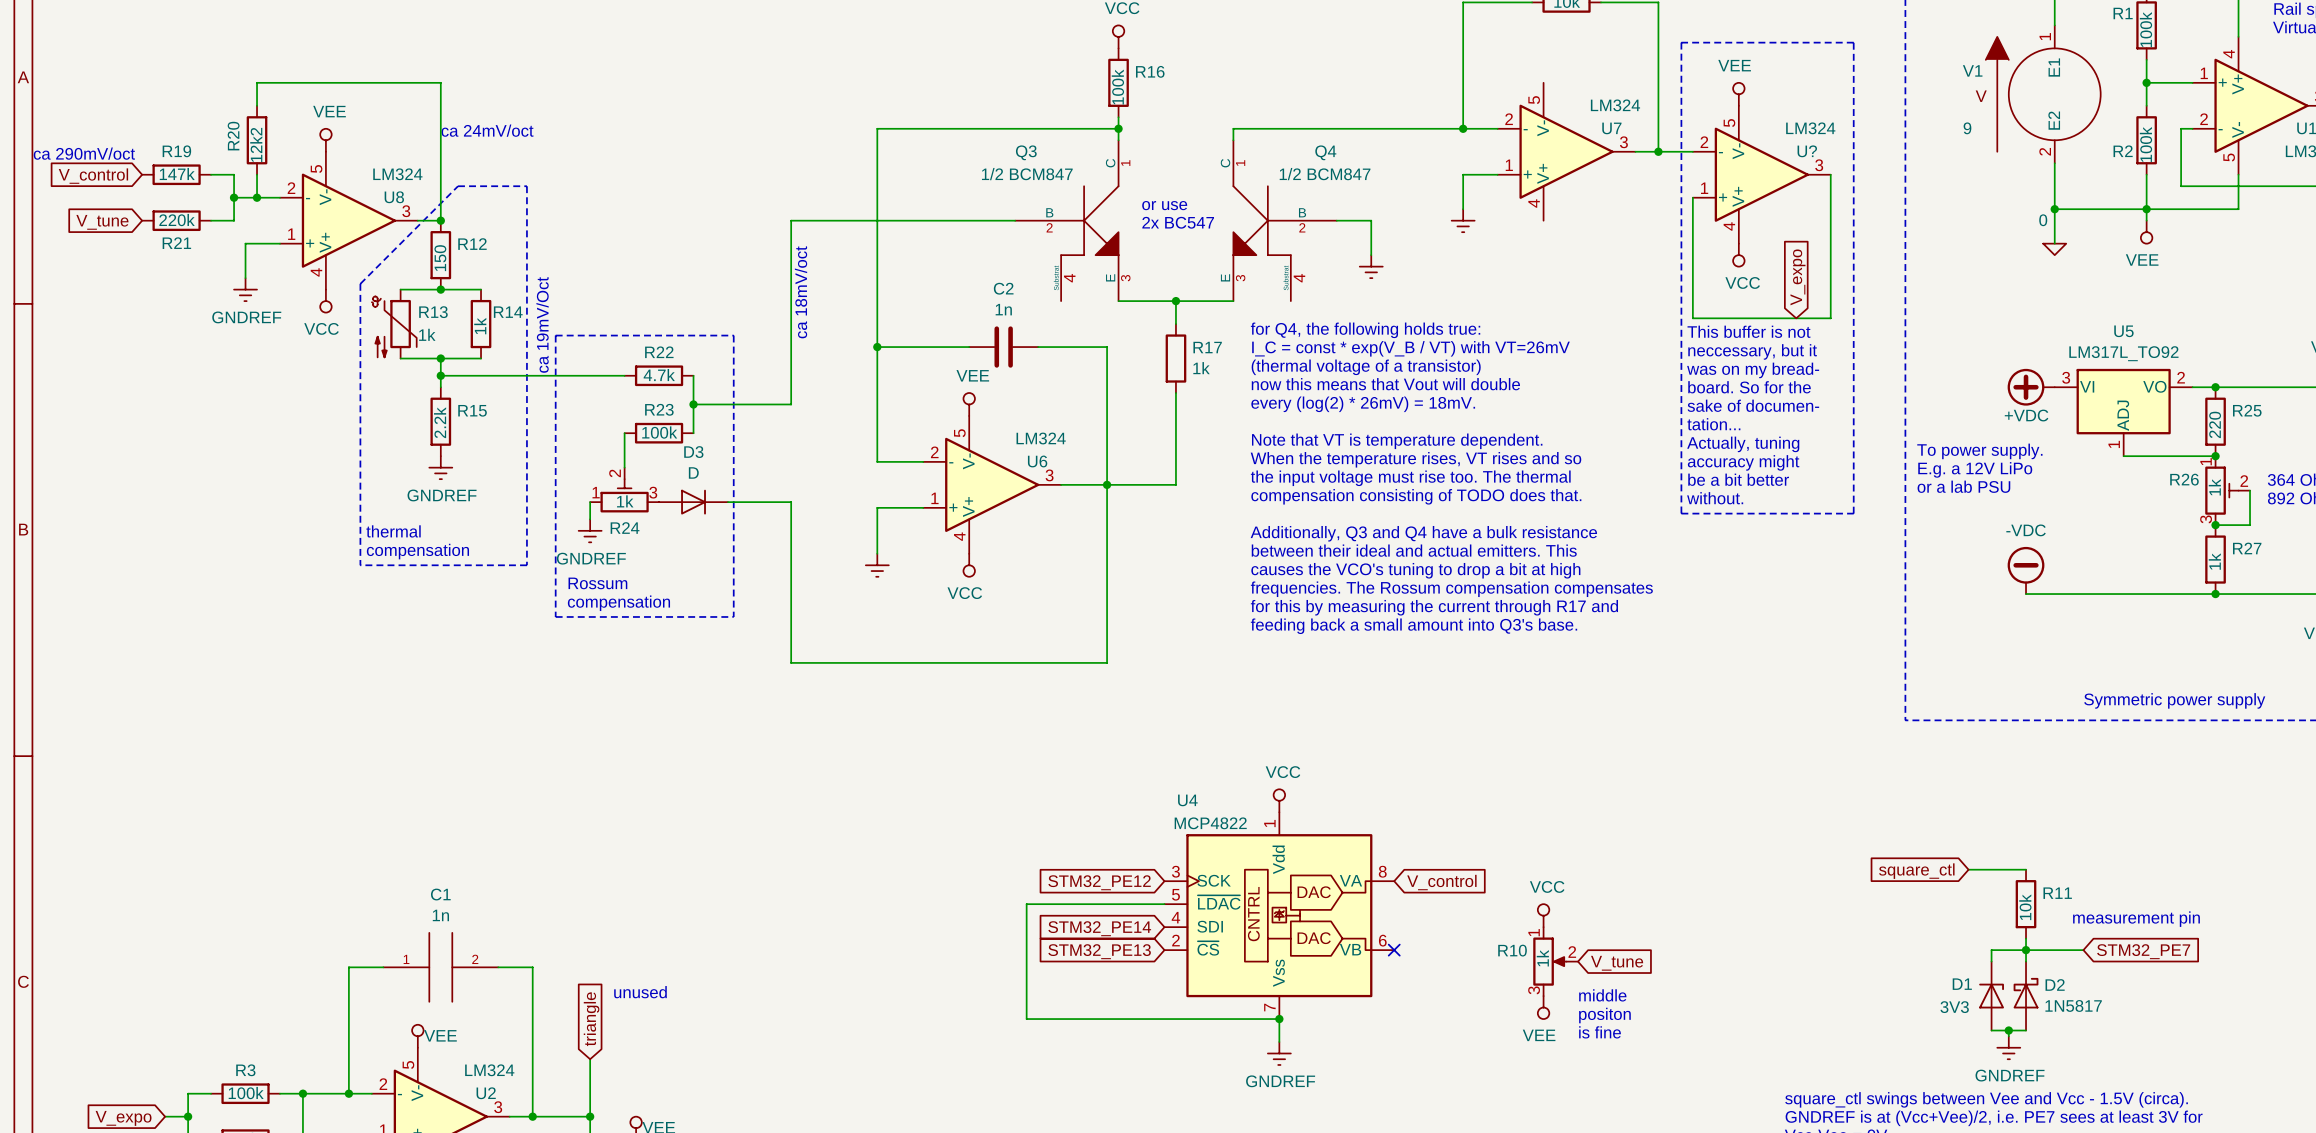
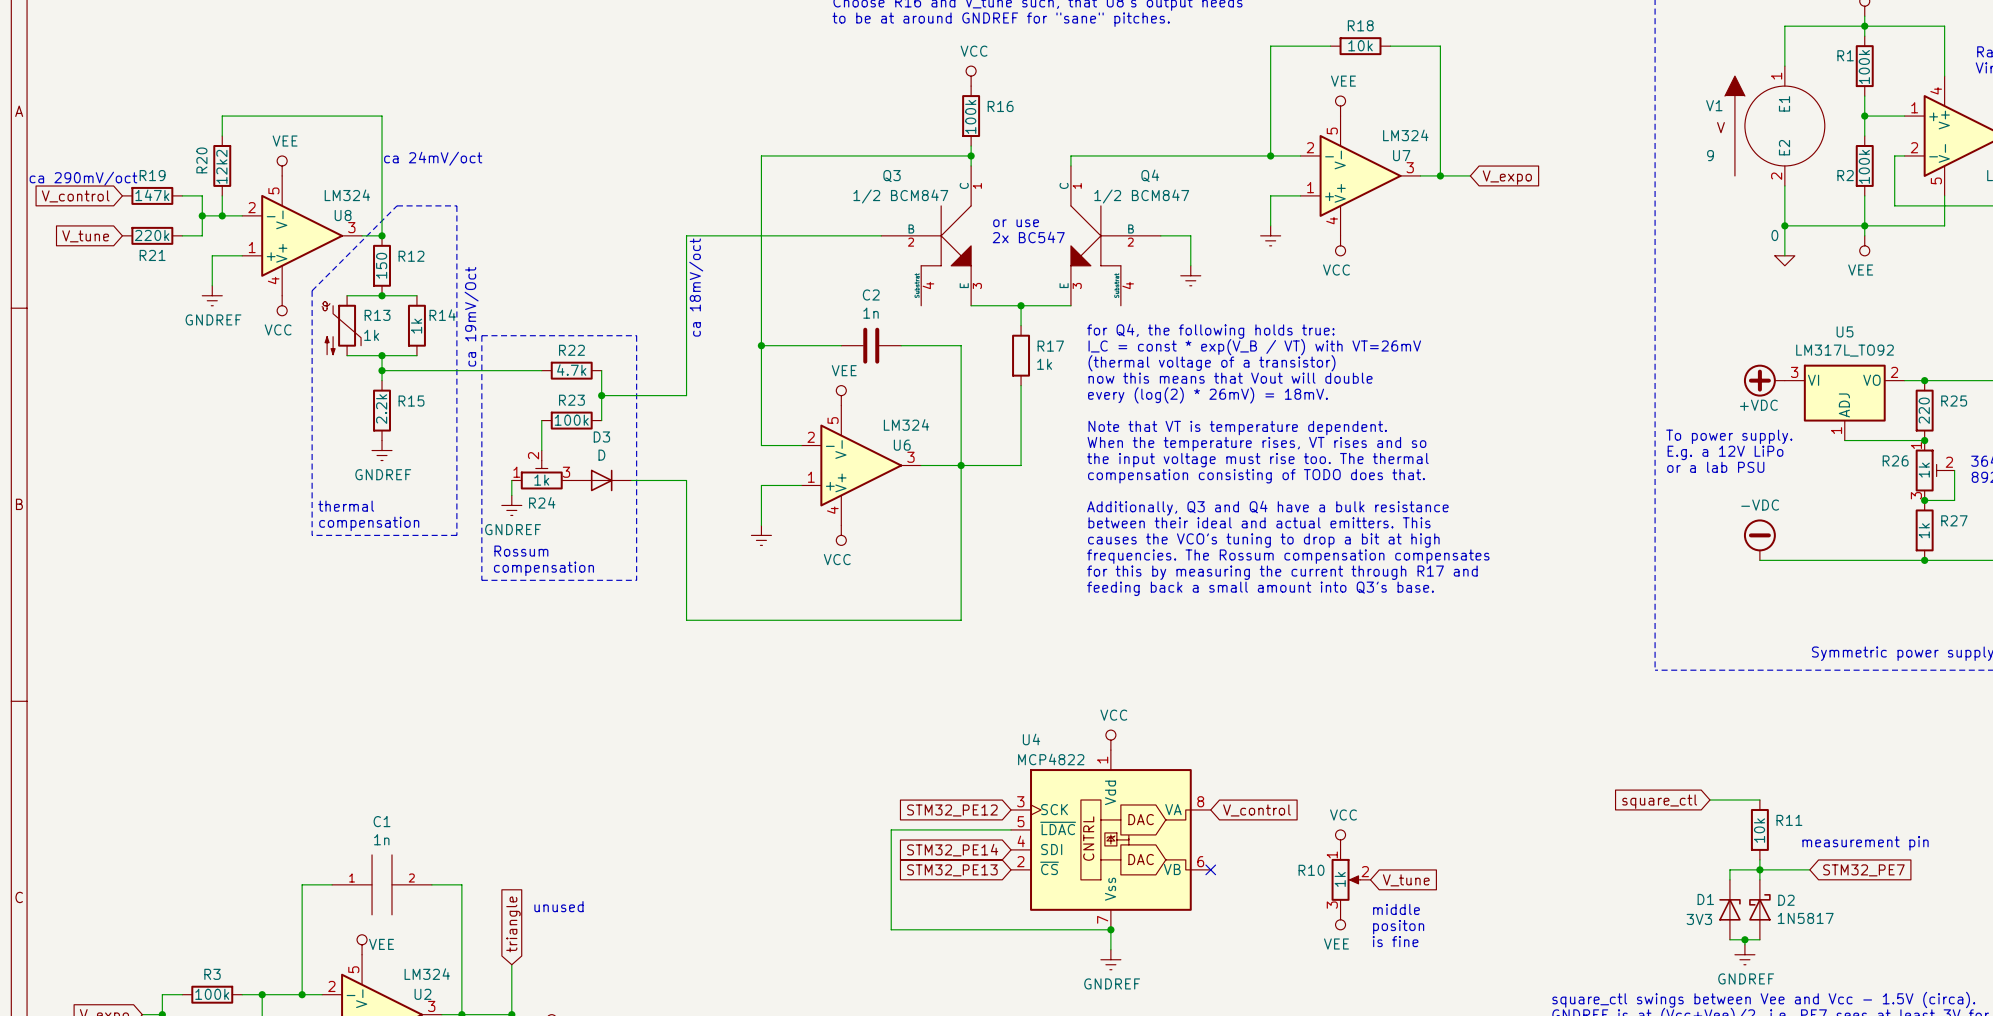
line: (1681, 42) (1853, 42) (1853, 513) (1681, 513) (1681, 42) -> none
power symbol text position: VEE (1734, 65) -> VEE (1343, 81)
power symbol position: VEE (1738, 94) -> VEE (1340, 106)
U?: LM324 (1761, 174) -> none
wire: (1830, 174) (1830, 318) (1692, 318) (1692, 197) -> none
power symbol position: VCC (1738, 255) -> VCC (1340, 245)
global label rotation: 0° (1798, 277) -> 90° clockwise (1507, 177)
global label position: V_expo (1798, 277) -> V_expo (1507, 177)
power symbol text position: VCC (1742, 282) -> VCC (1336, 270)
text: This buffer is not (1748, 331) -> none
text: neccessary, but it (1752, 351) -> none
text: was on my bread- (1753, 370) -> none
text: board. So for the (1749, 387) -> none
text: sake of documen- (1753, 405) -> none
text: tation... (1713, 424) -> none
text: Actually, tuning (1743, 444) -> none
text: accuracy might (1743, 462) -> none
text: be a bit better (1738, 479) -> none
text: without. (1715, 498) -> none

